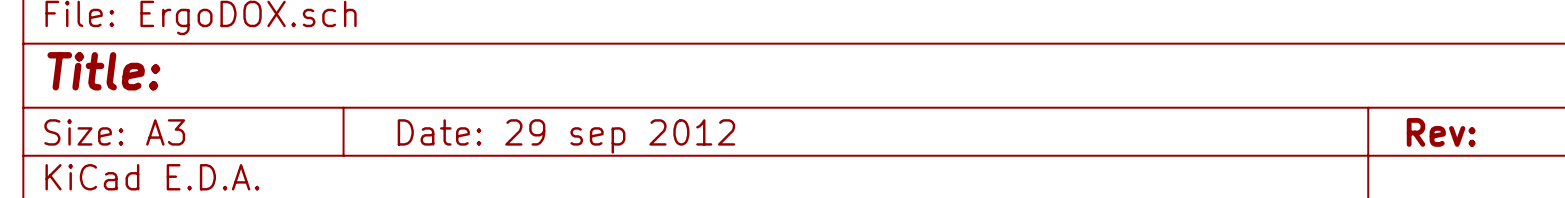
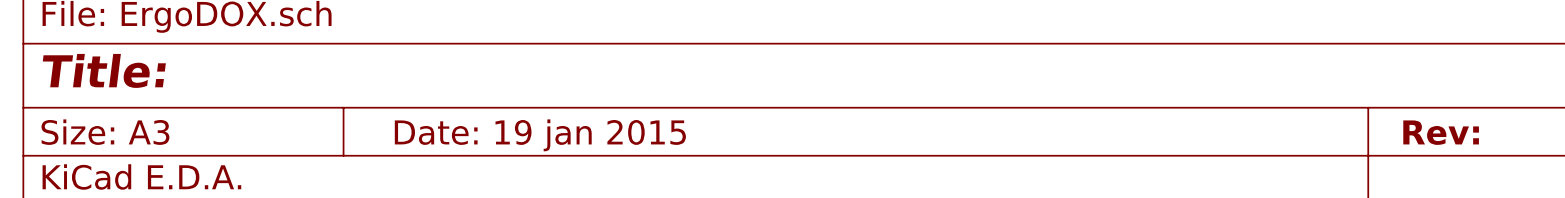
title block: Date: 29 sep 2012 (566, 136) -> Date: 19 jan 2015 (540, 135)

